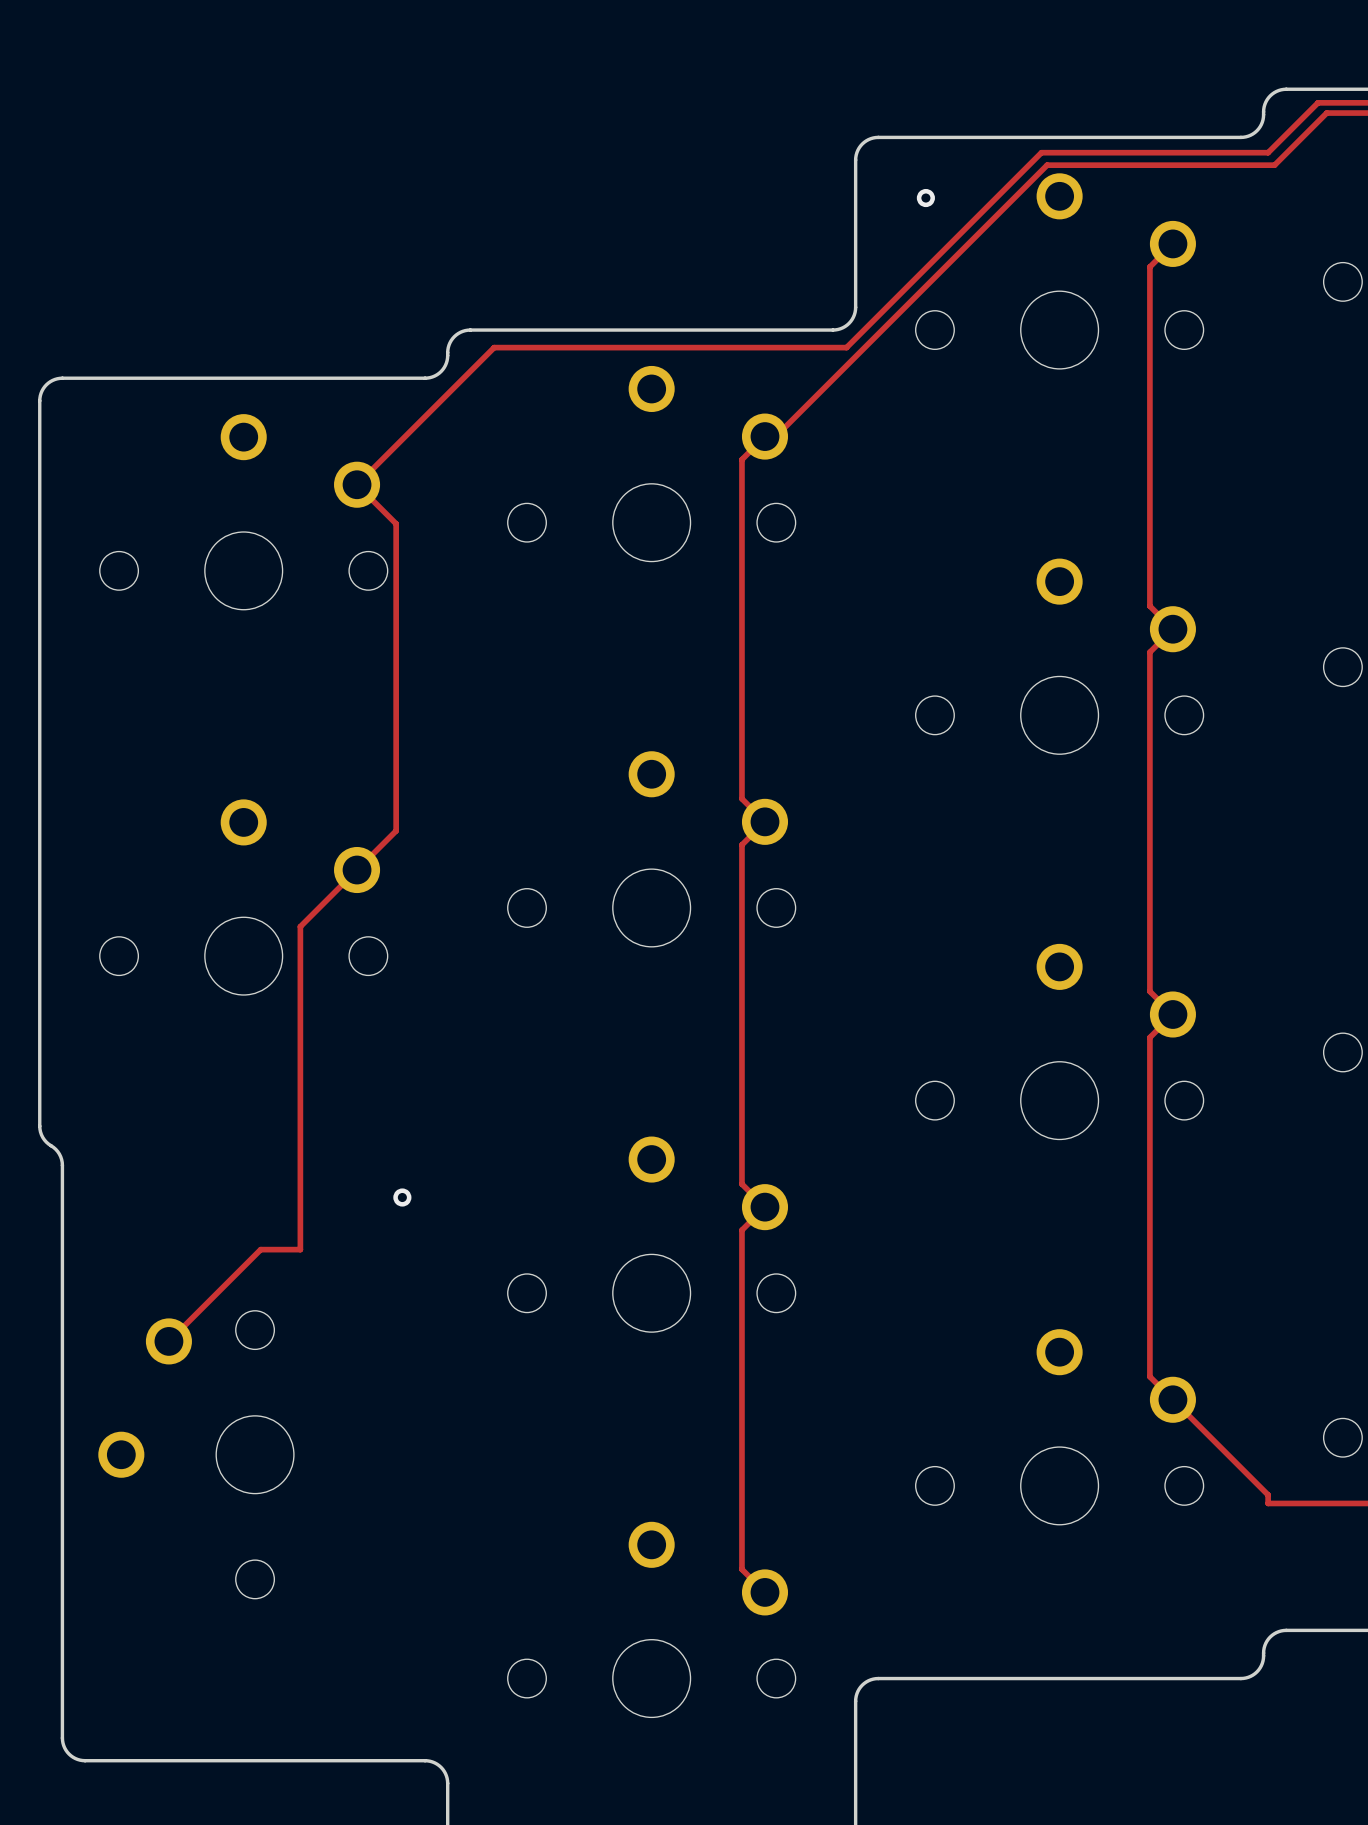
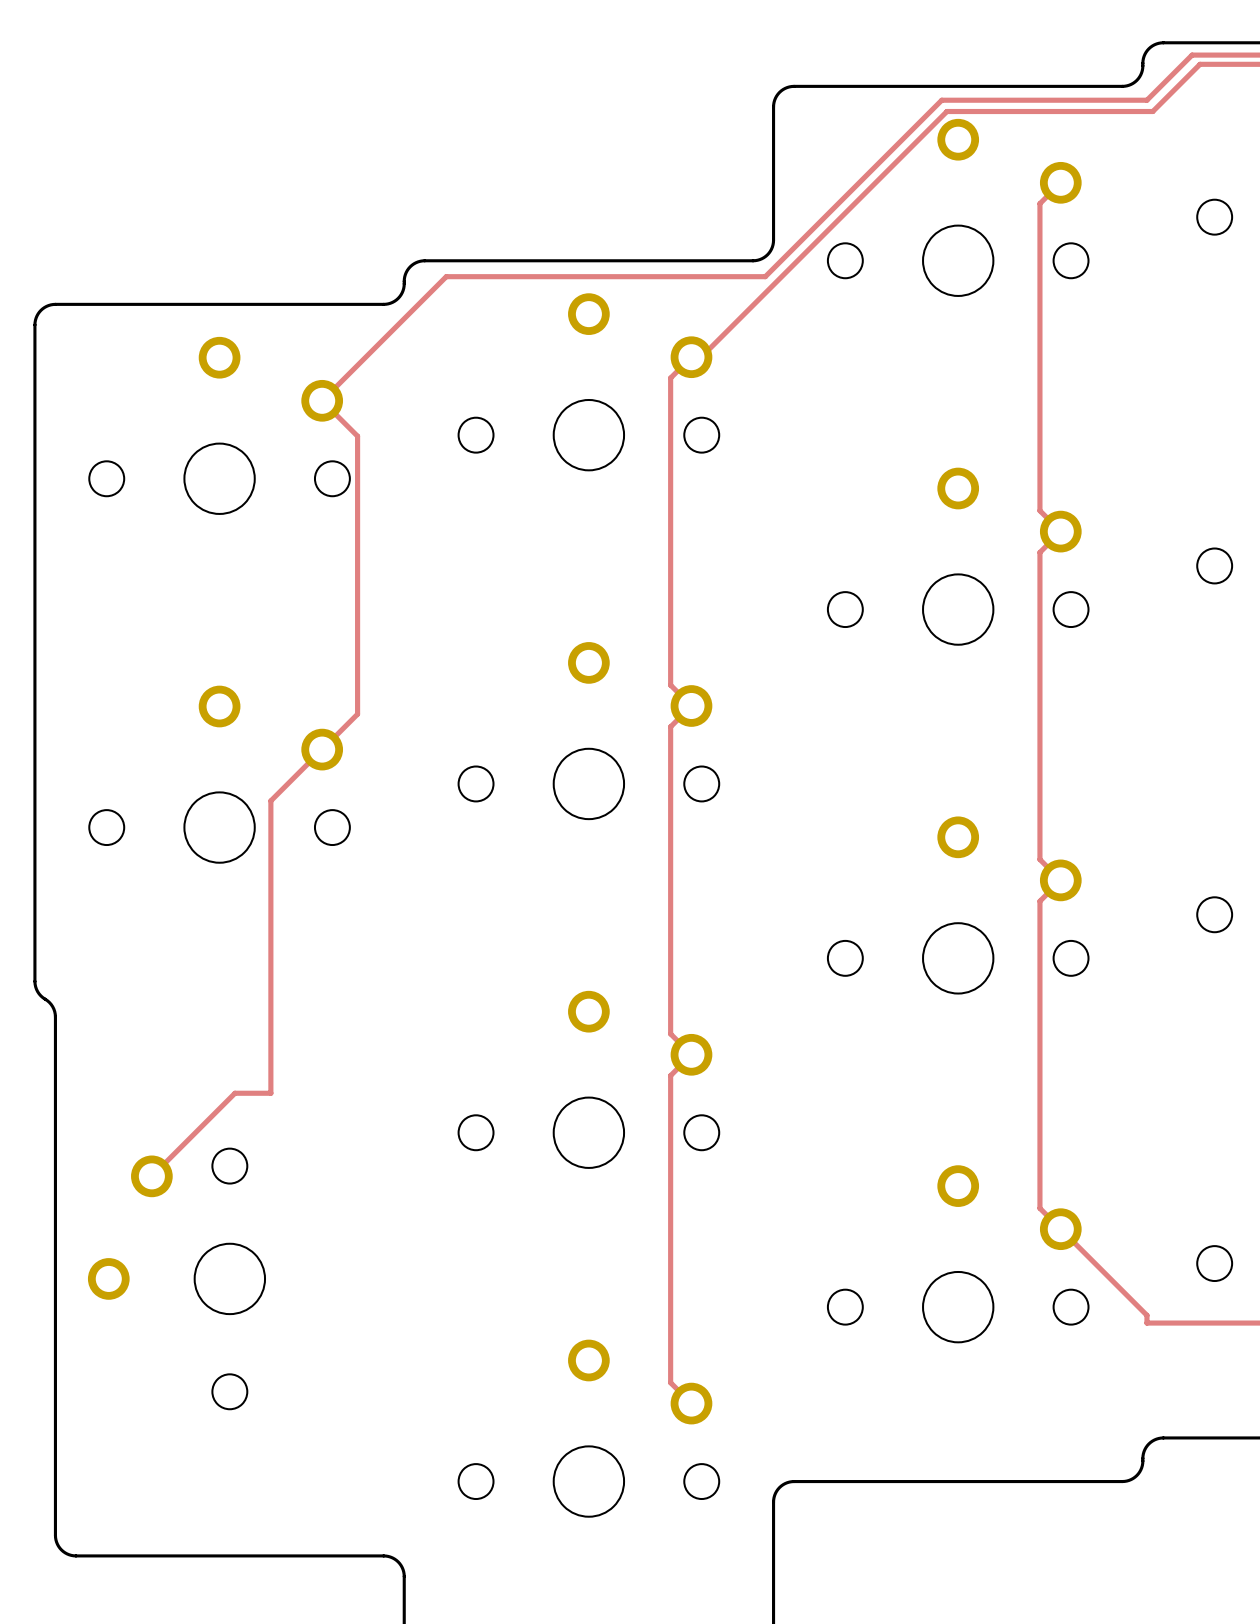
via: (925, 198) -> none
via: (402, 1197) -> none

